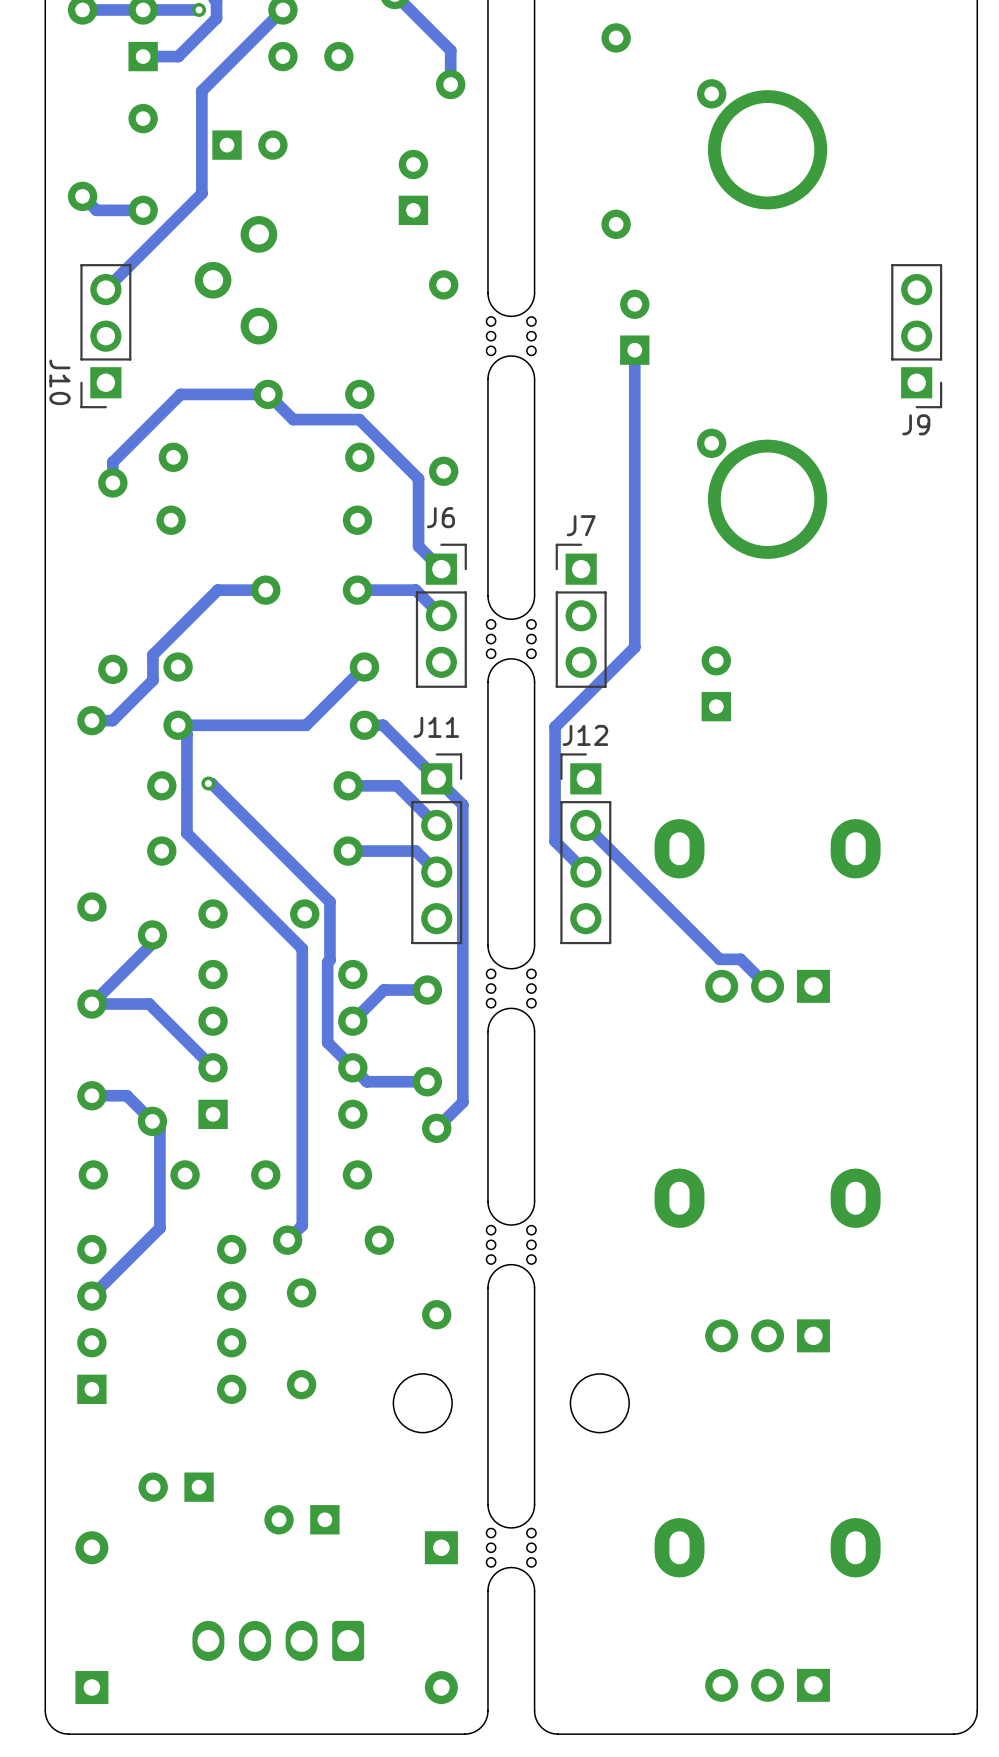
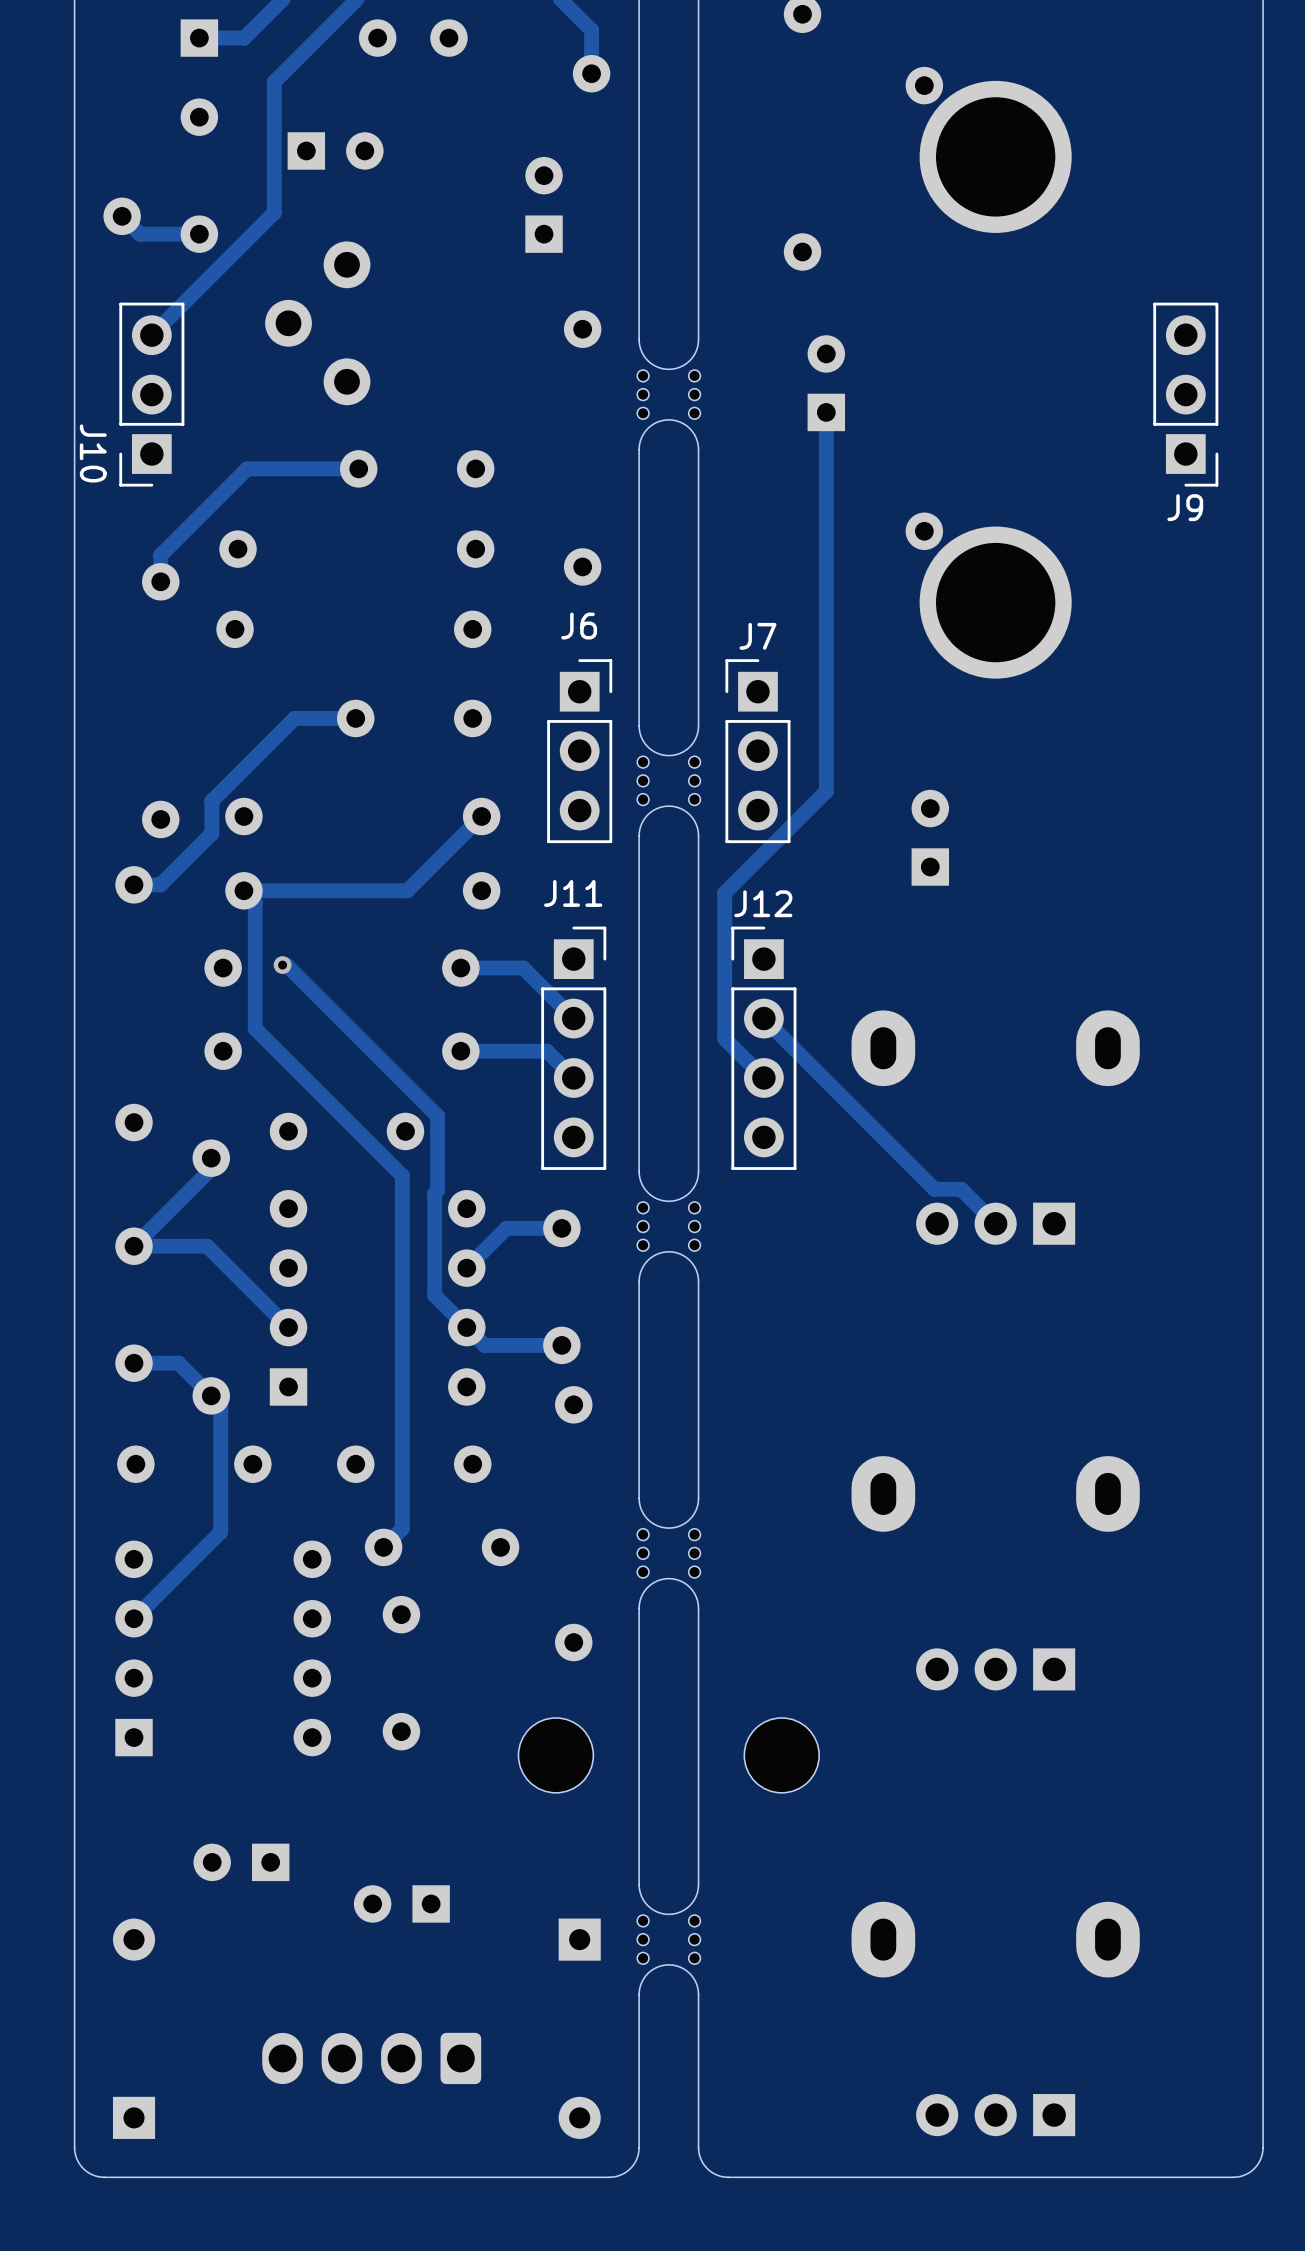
track: (268, 394) (293, 419) (359, 419) (418, 478) (418, 546) (437, 564) -> none
track: (357, 590) (415, 590) (441, 615) -> none
track: (364, 725) (383, 725) (462, 804) (462, 1102) (436, 1128) -> none

